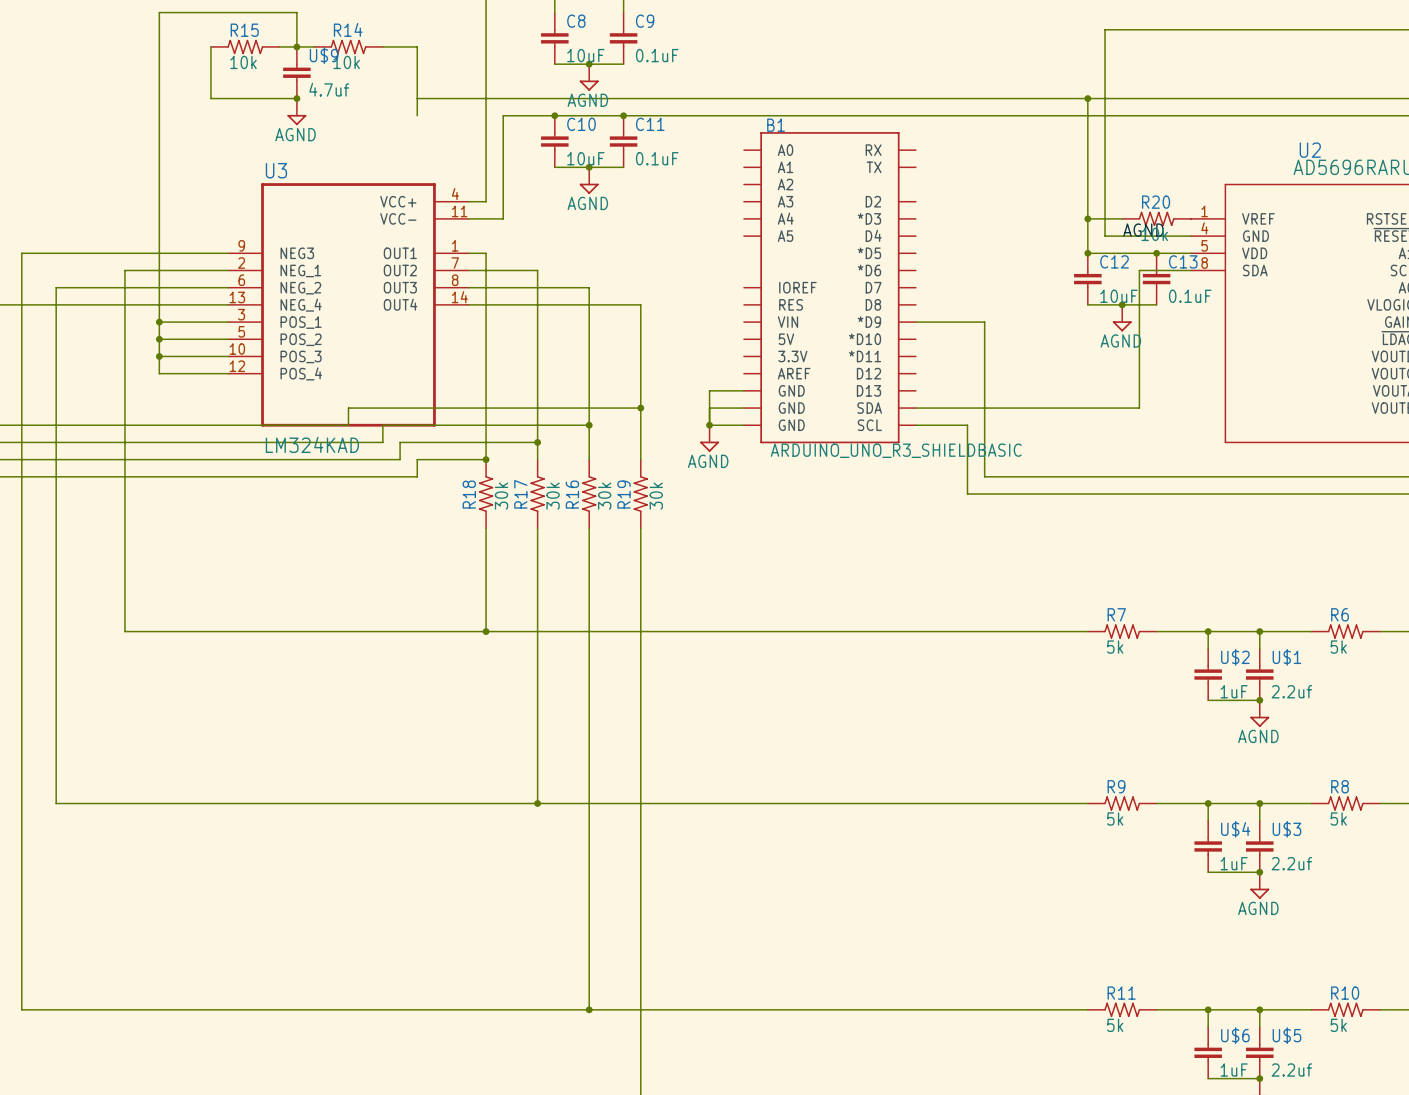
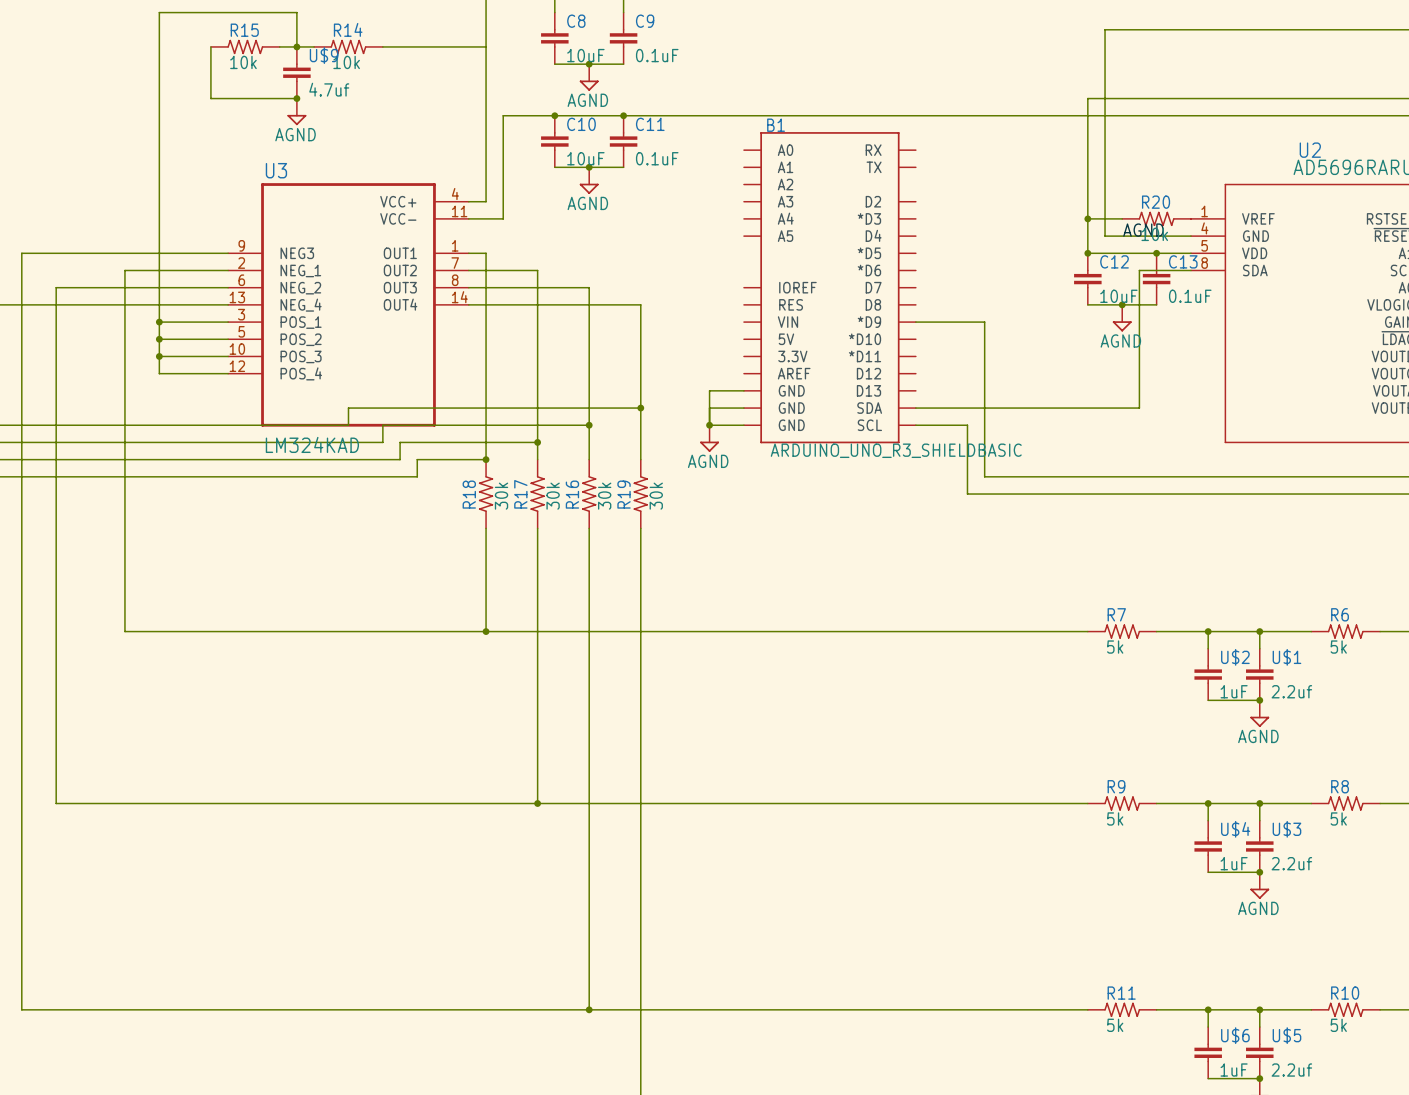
wire: (417, 46) (417, 115) -> (417, 46) (486, 46)
wire: (417, 98) (1087, 98) -> none
junction: (1087, 98) -> none

